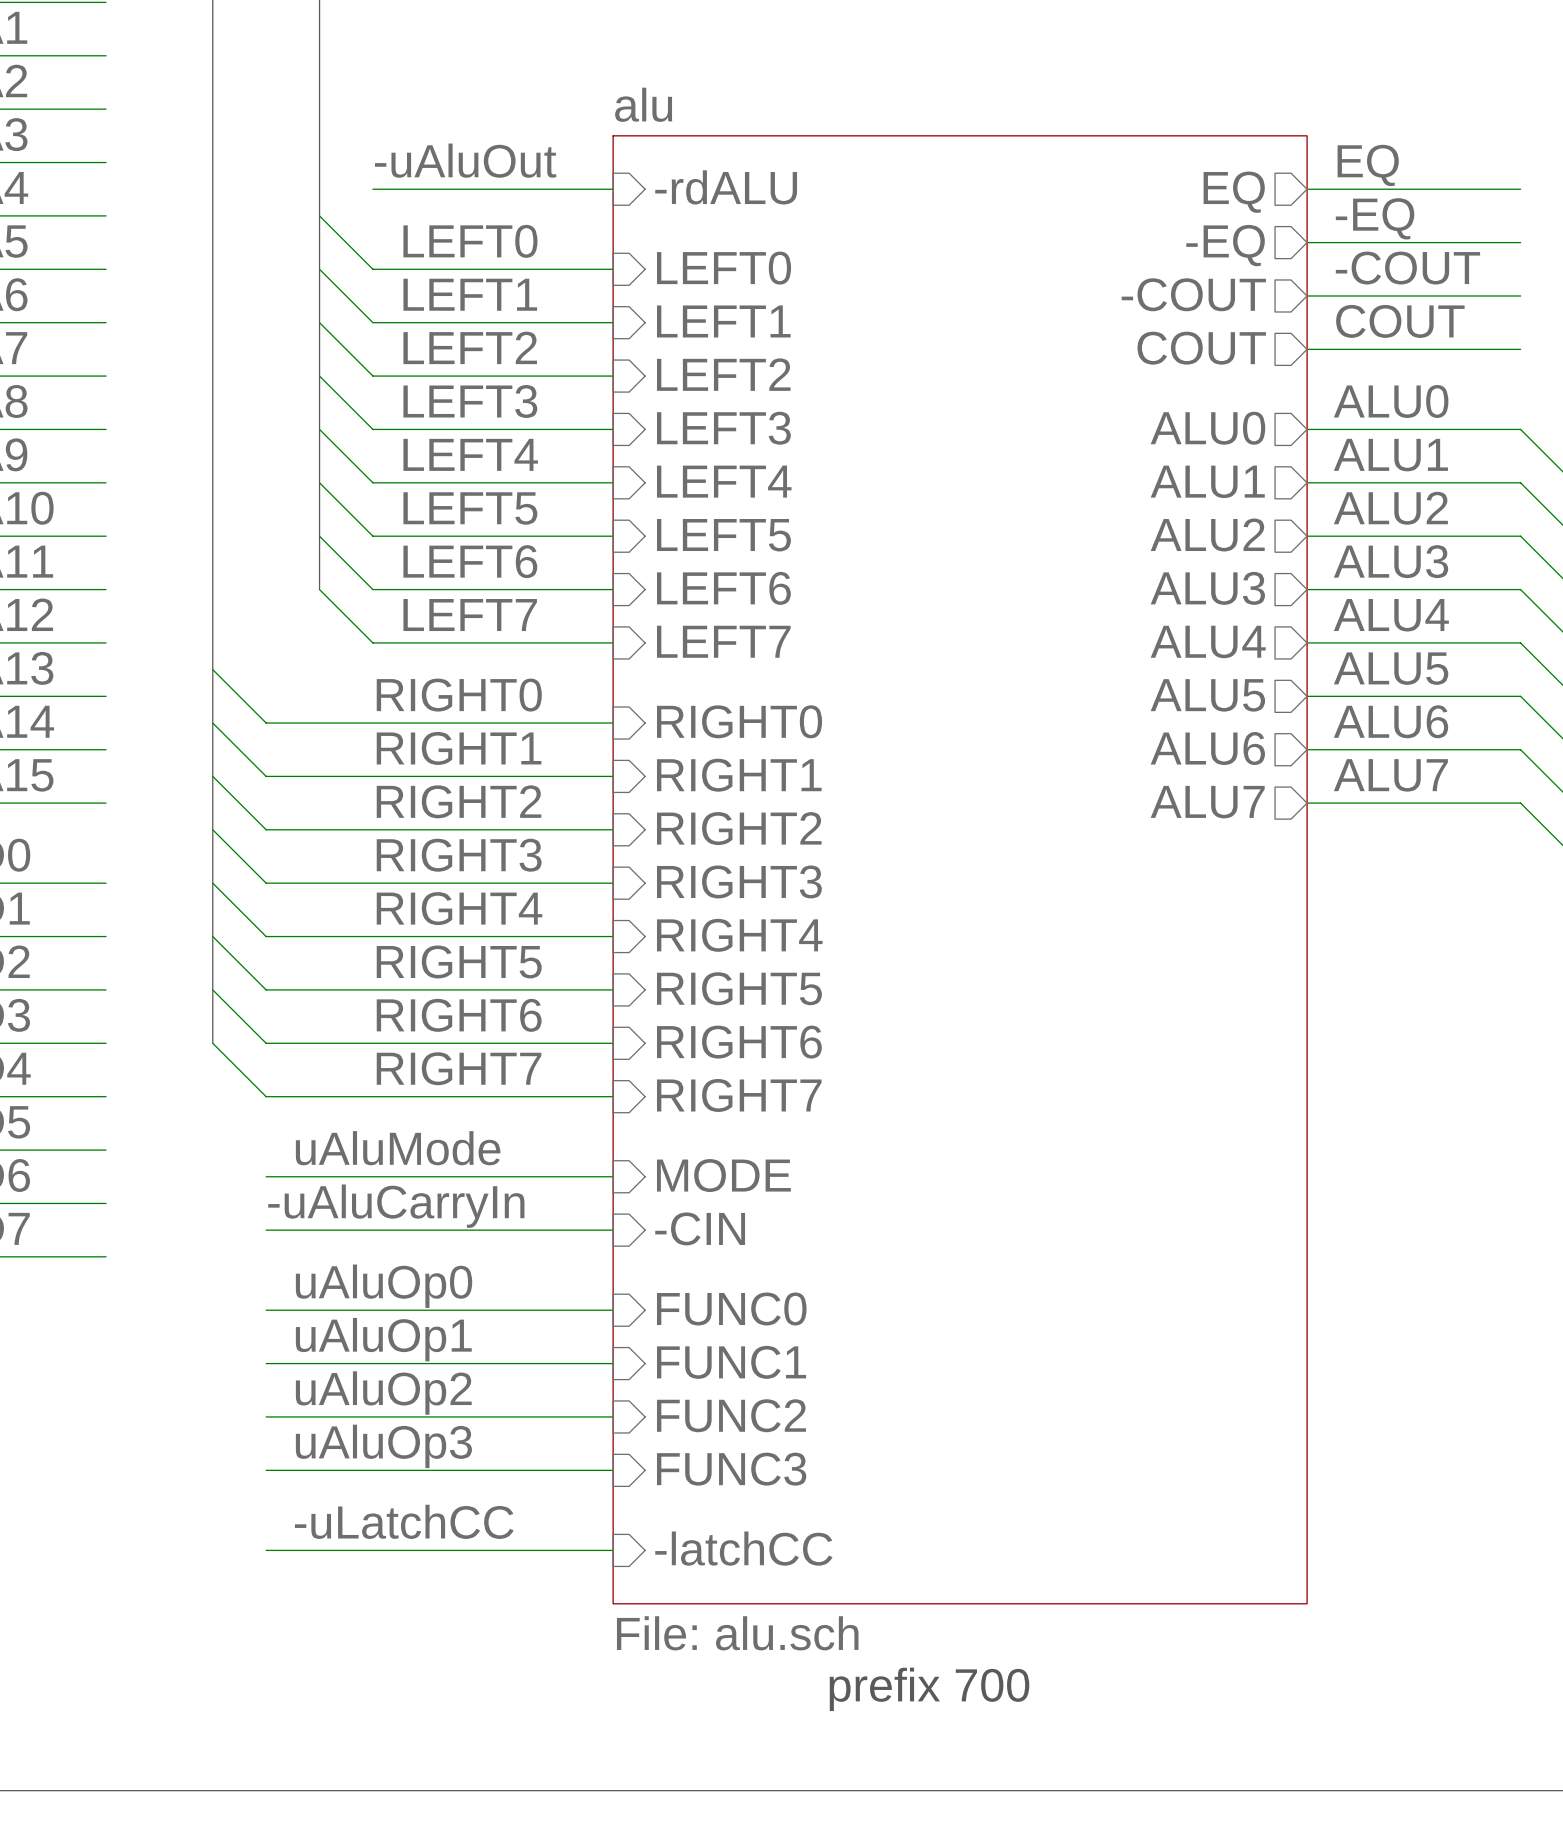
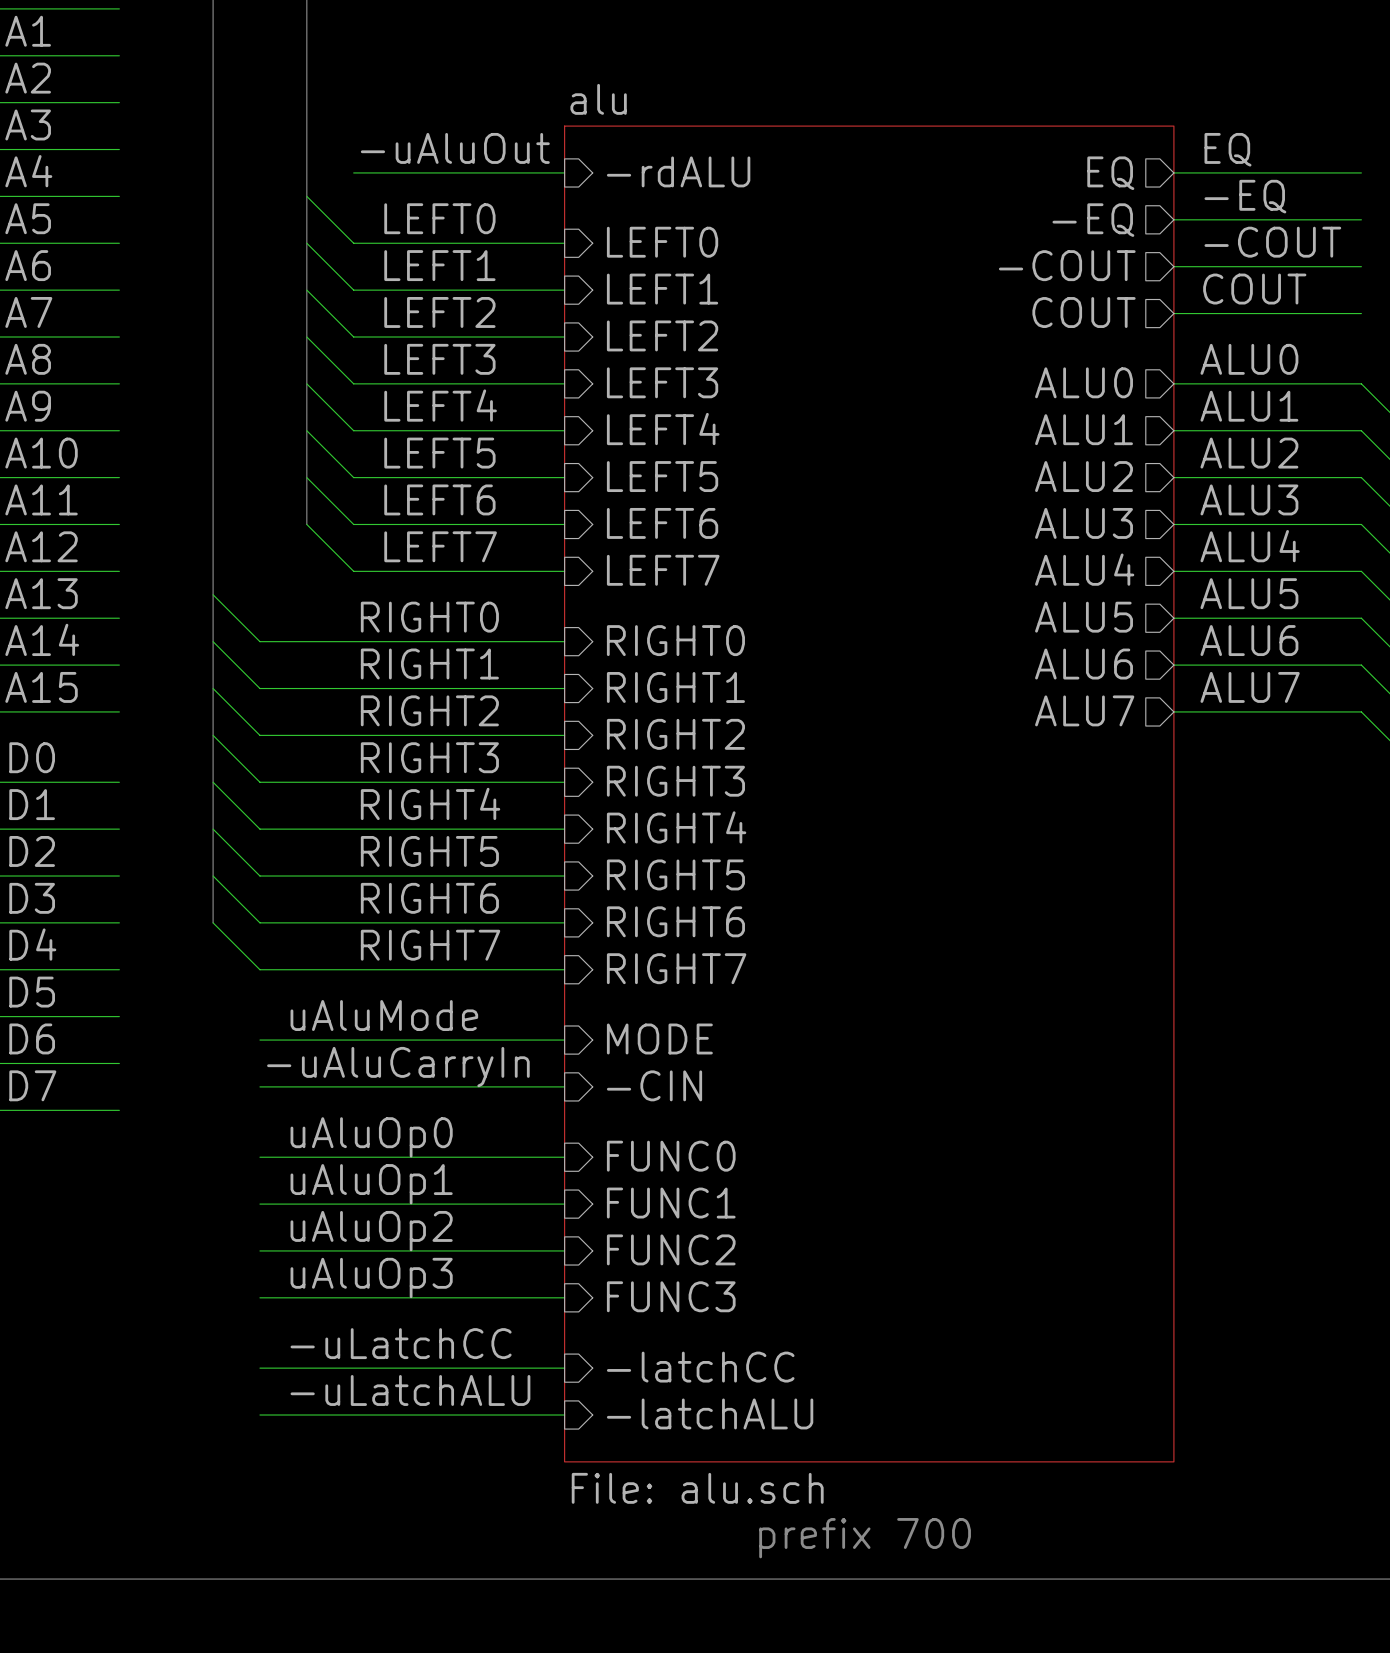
sheet alu: File: alu.sch (960, 869) -> none
sheet alu: none -> File: alu.sch (869, 793)
label: none -> -uLatchALU (410, 1390)
sheet pin: none -> -latchALU (710, 1413)
wire: none -> (259, 1415) (564, 1415)
text position: prefix 700 (929, 1689) -> prefix 700 (865, 1538)

